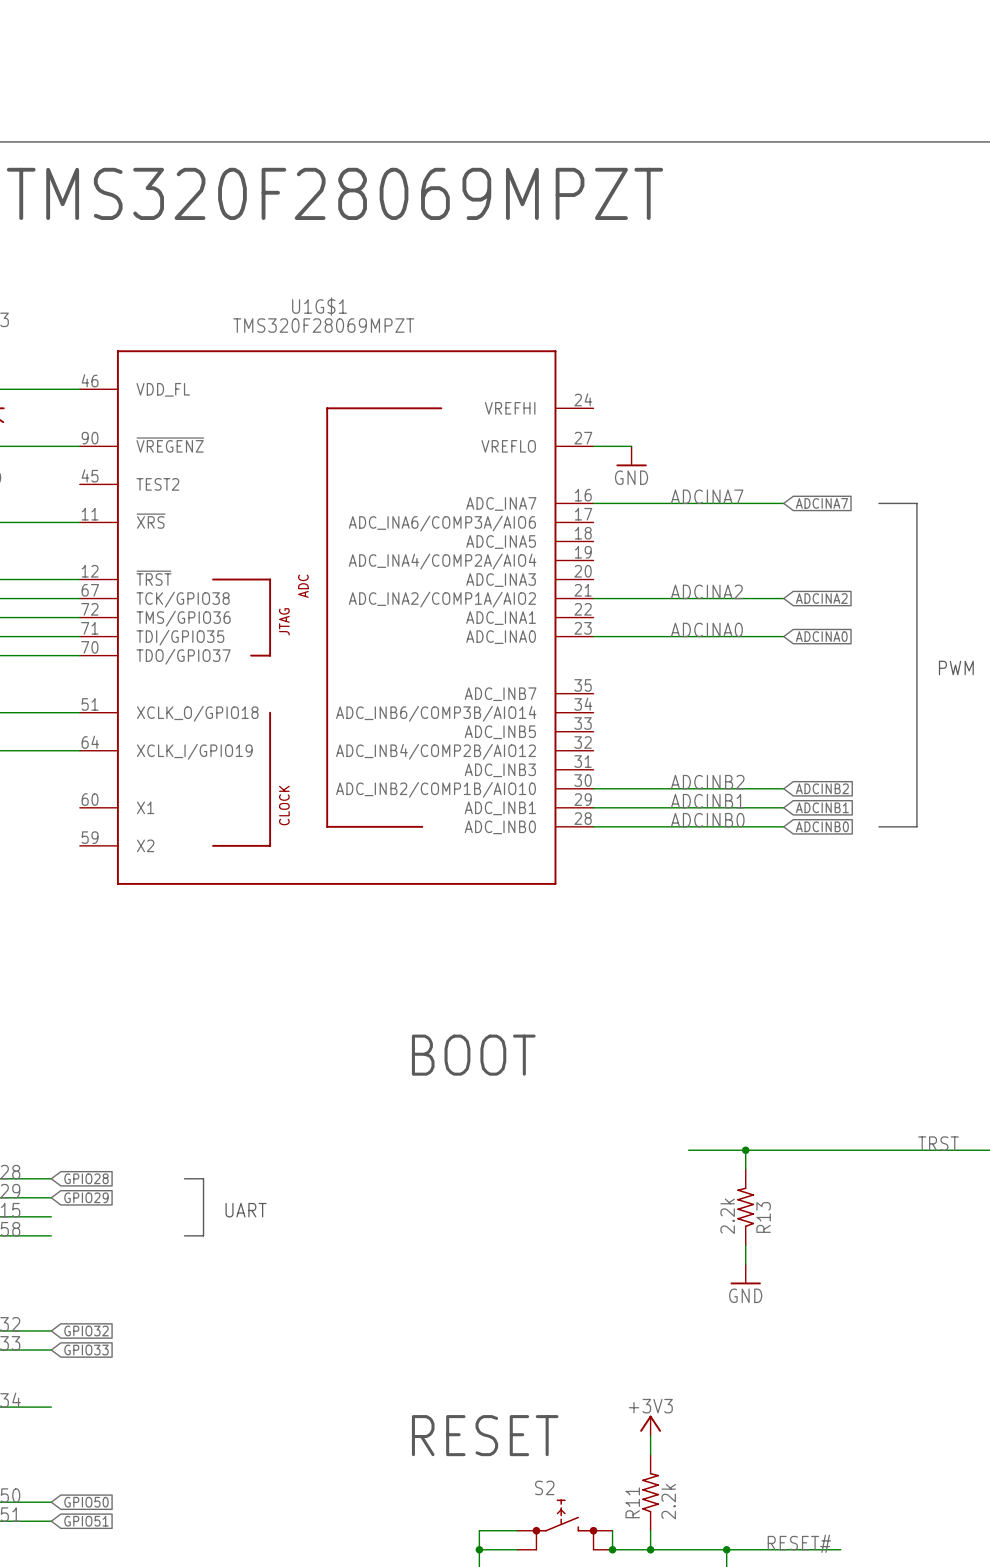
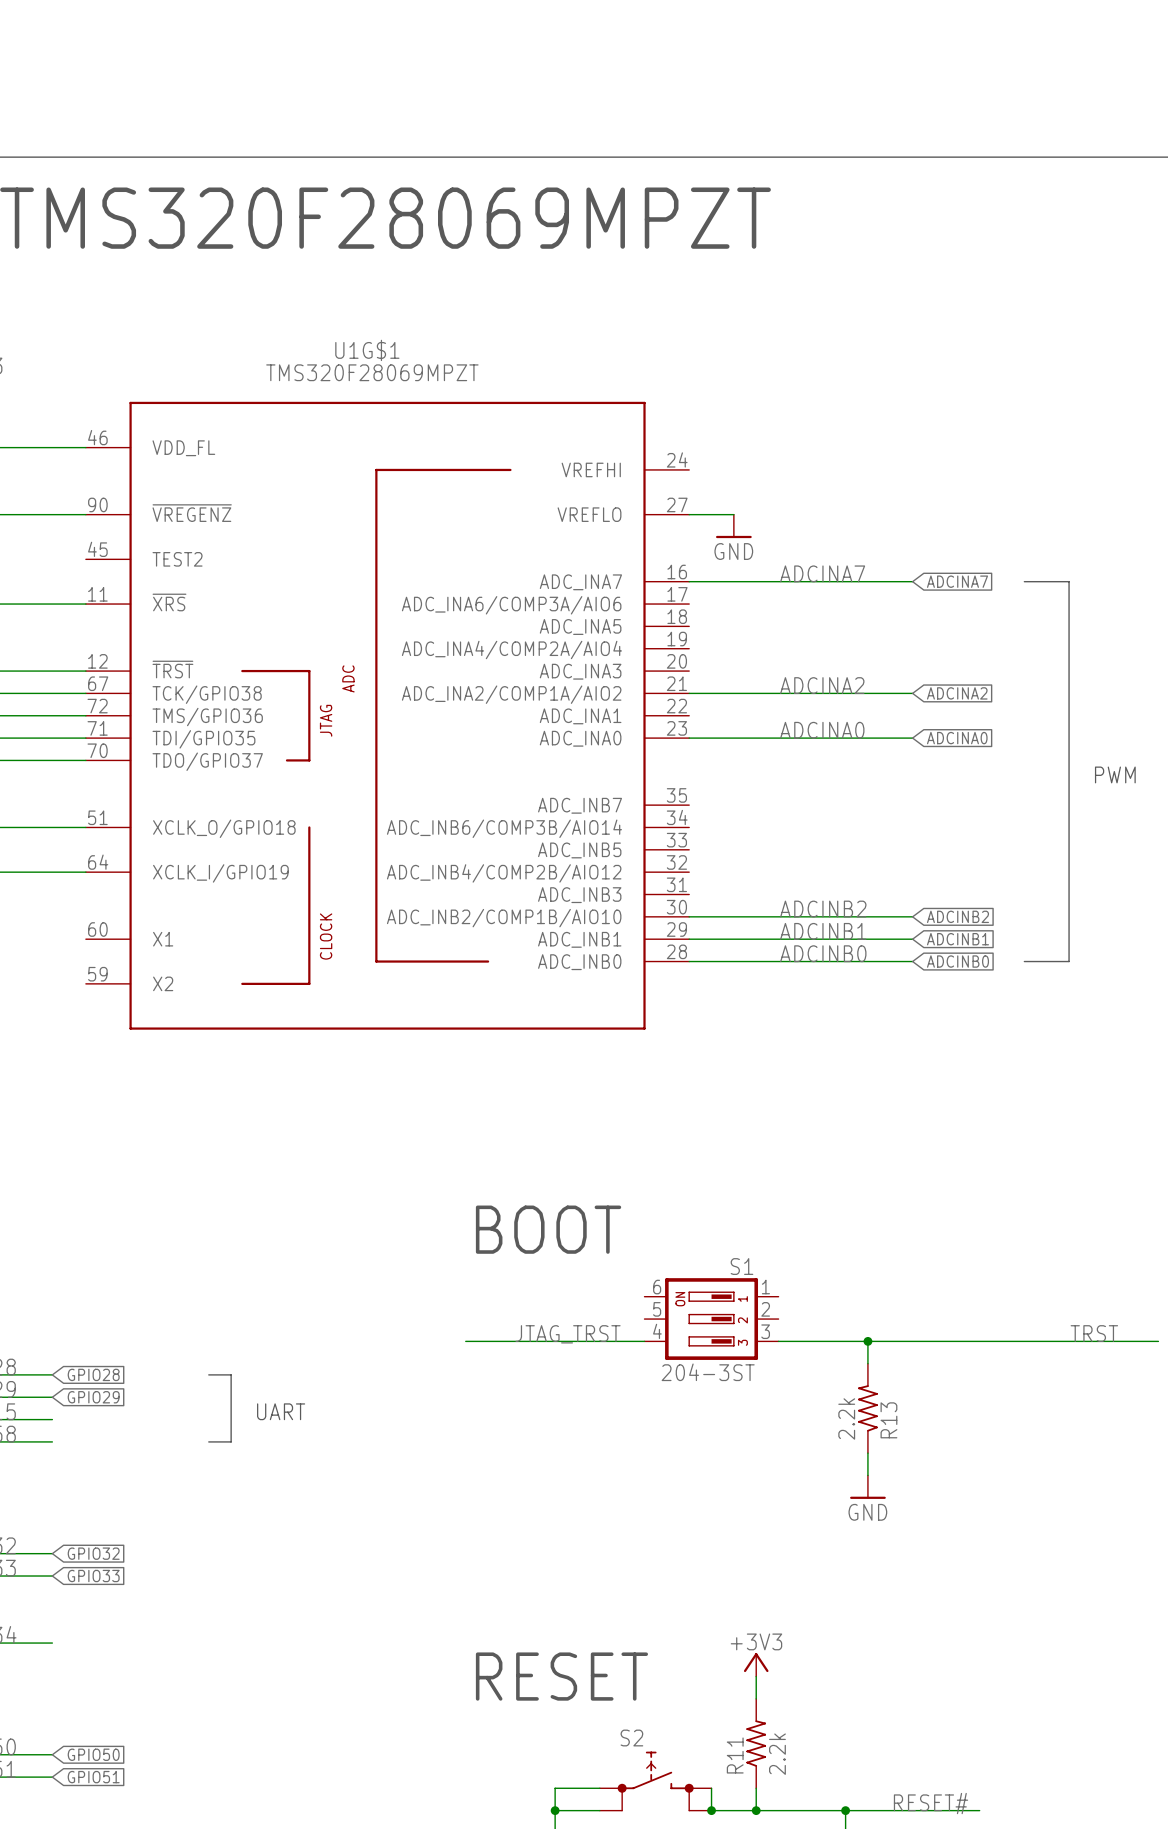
S1: none -> 204-3ST (711, 1319)
label: none -> JTAG_TRST (568, 1334)
wire: none -> (465, 1341) (644, 1341)
wire: none -> (778, 1341) (800, 1341)

